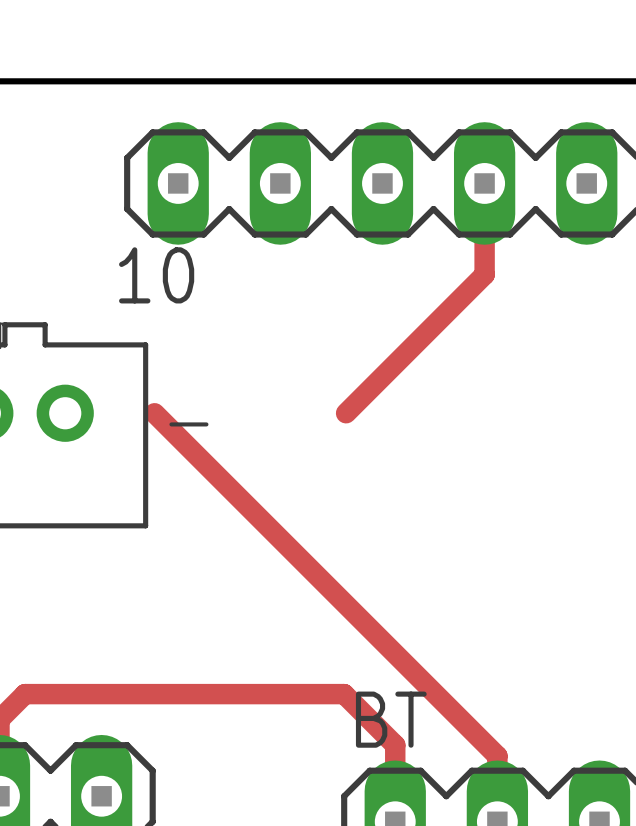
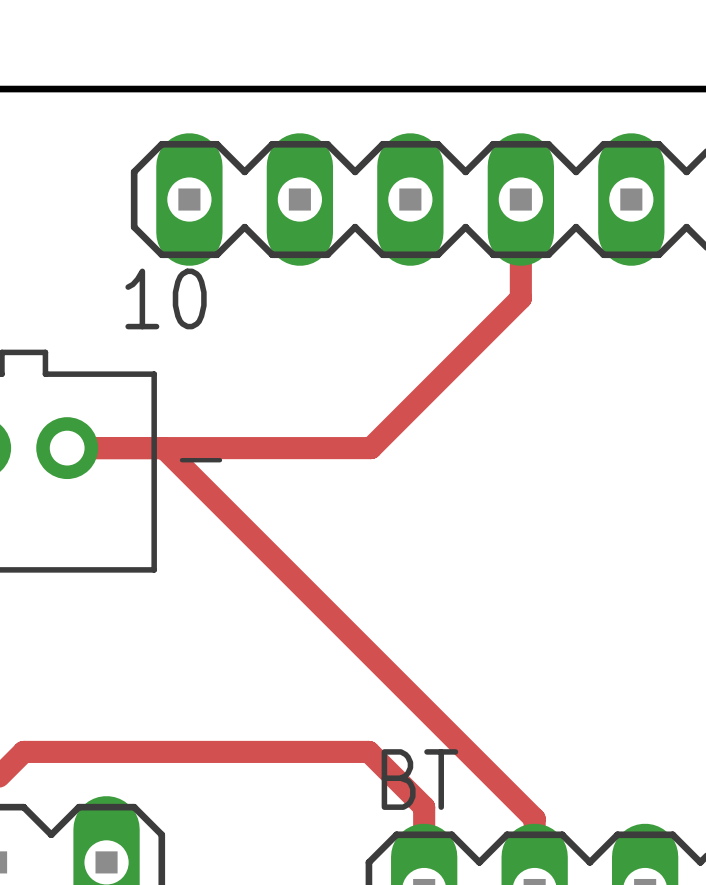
track: none -> (67, 448) (371, 448)

